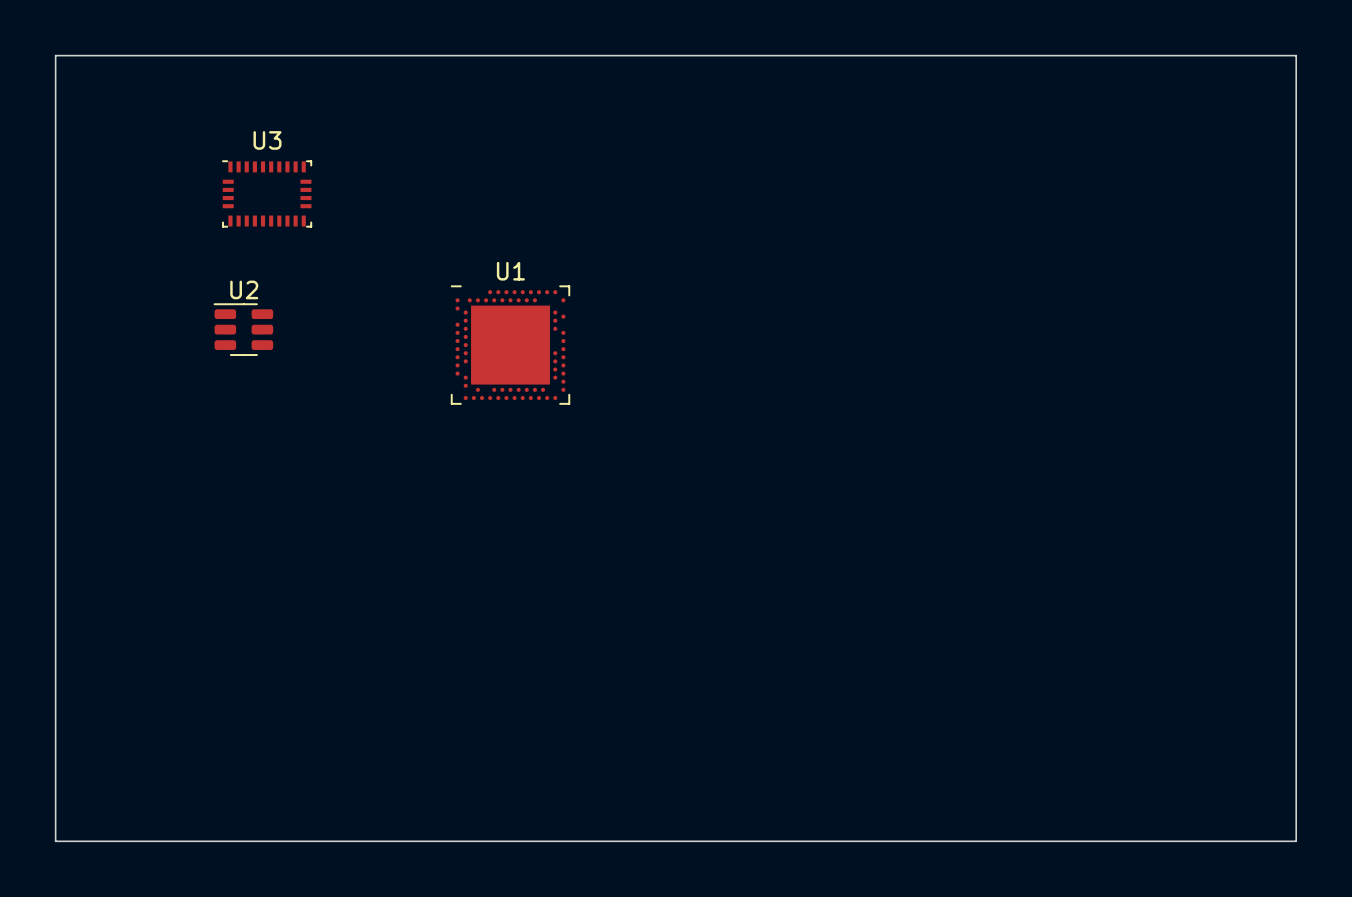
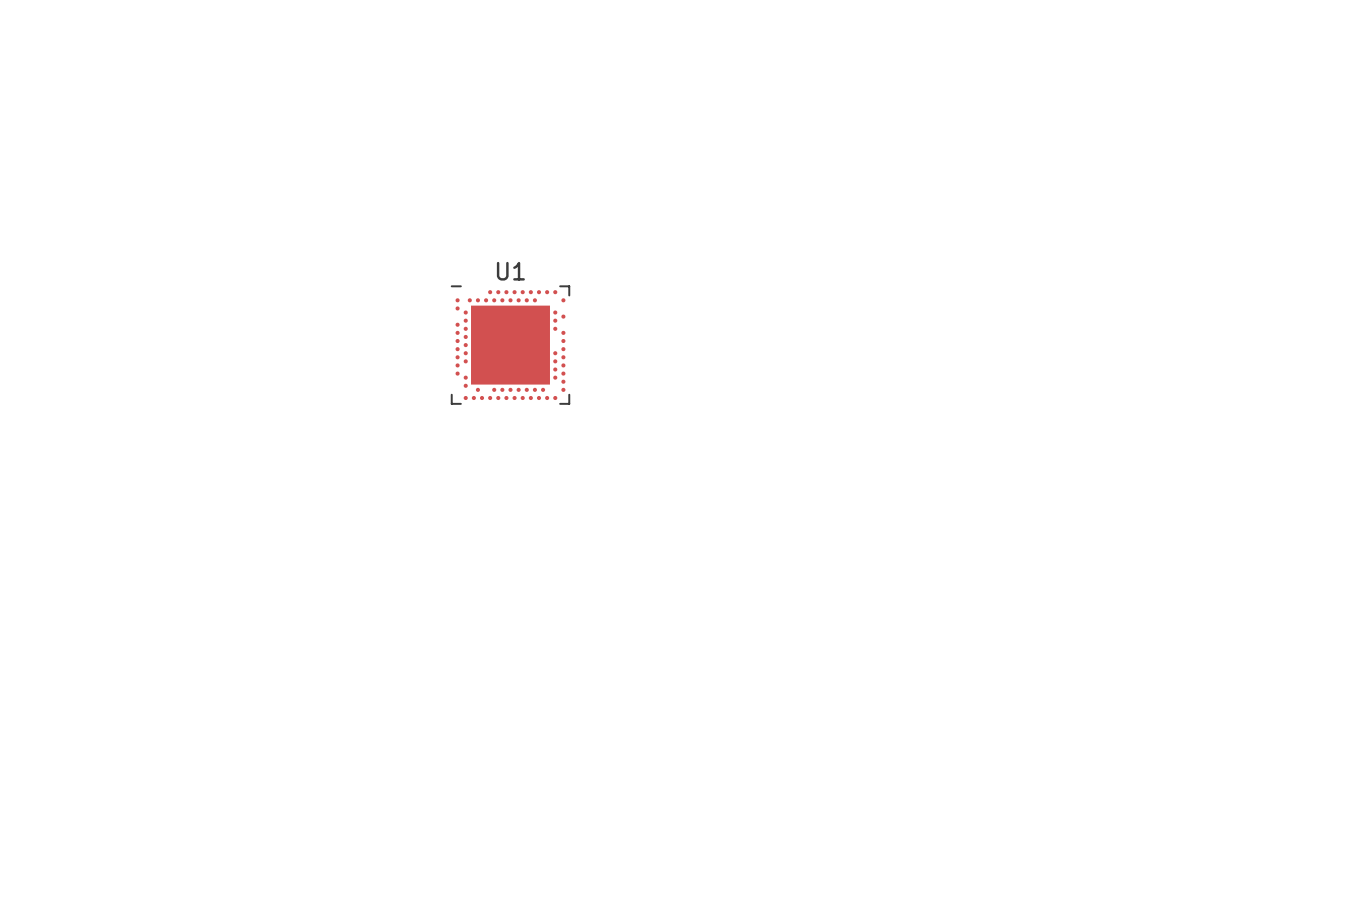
board edge: (55, 55) (1296, 55) (1296, 841) (55, 841) (55, 55) -> none
U3: (267, 193) -> none
U2: (243, 329) -> none

